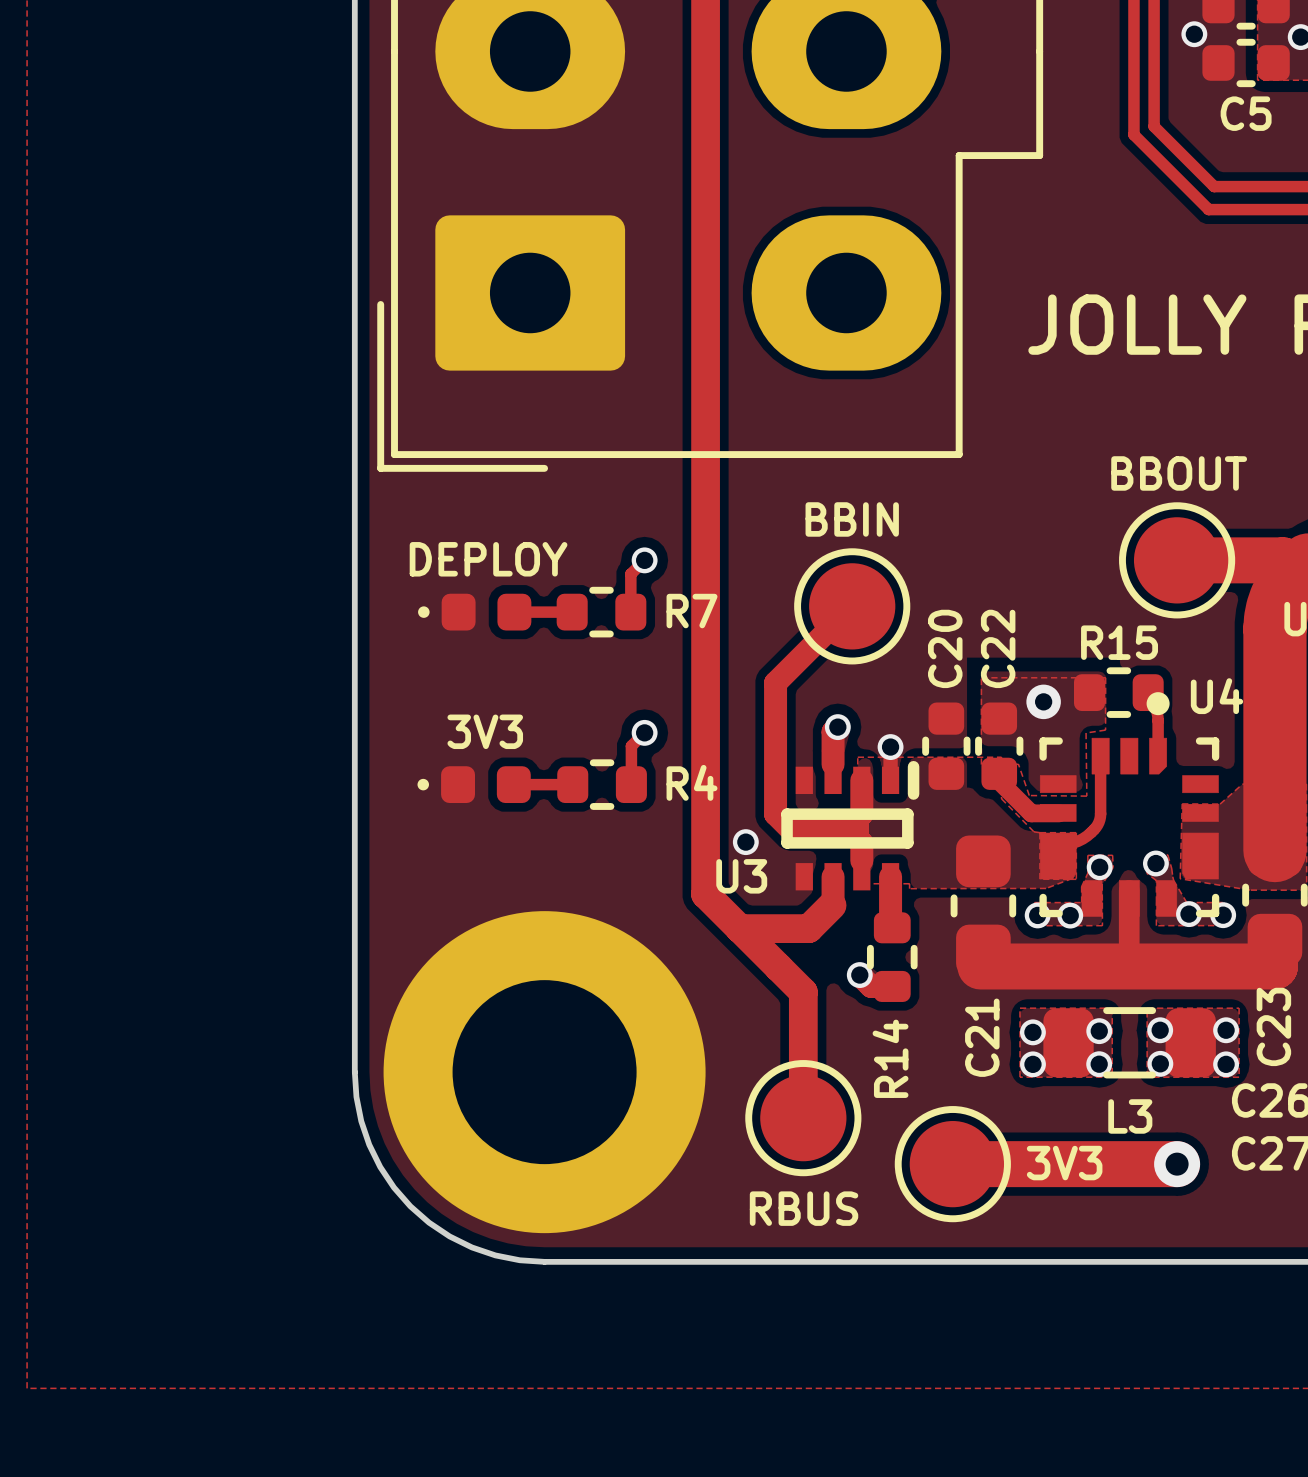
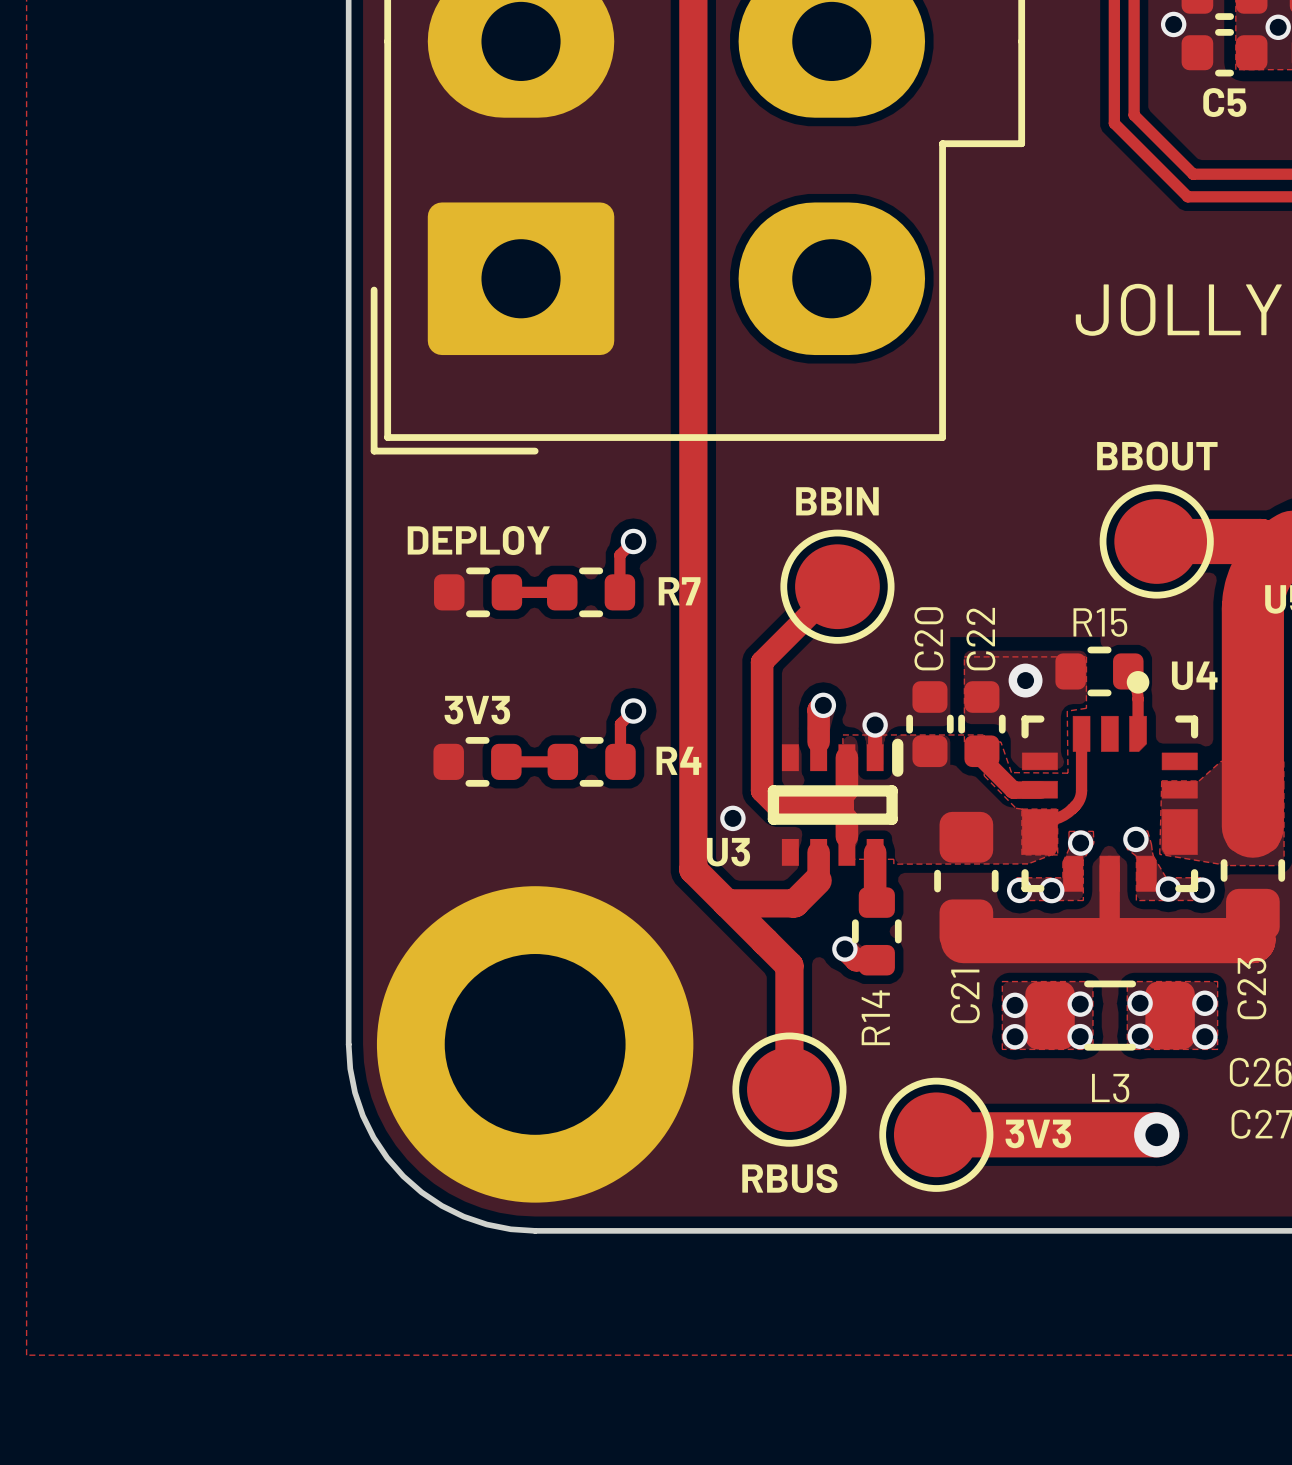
DEPLOY footprint: [418, 593, 532, 631] -> [434, 567, 523, 618]
3V3 footprint: [417, 766, 531, 804] -> [433, 737, 522, 787]

